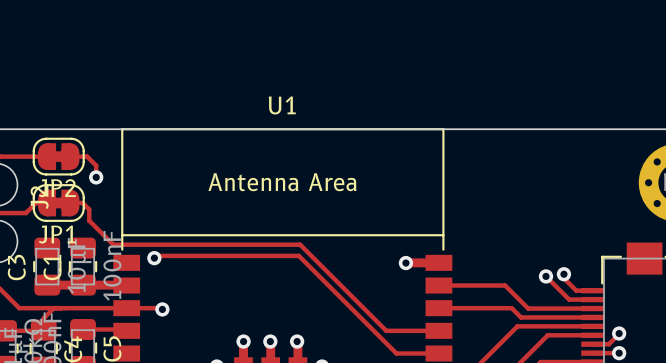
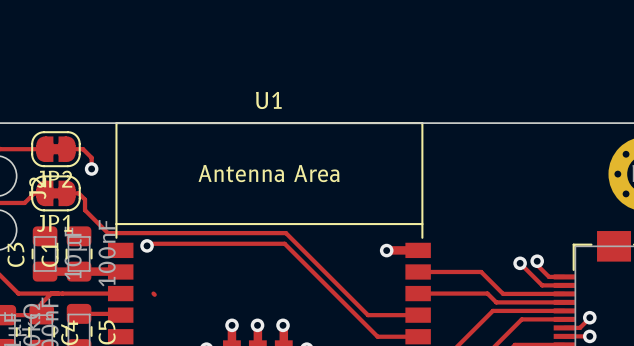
track: (126, 308) (161, 308) -> none
via: (162, 309) -> none

